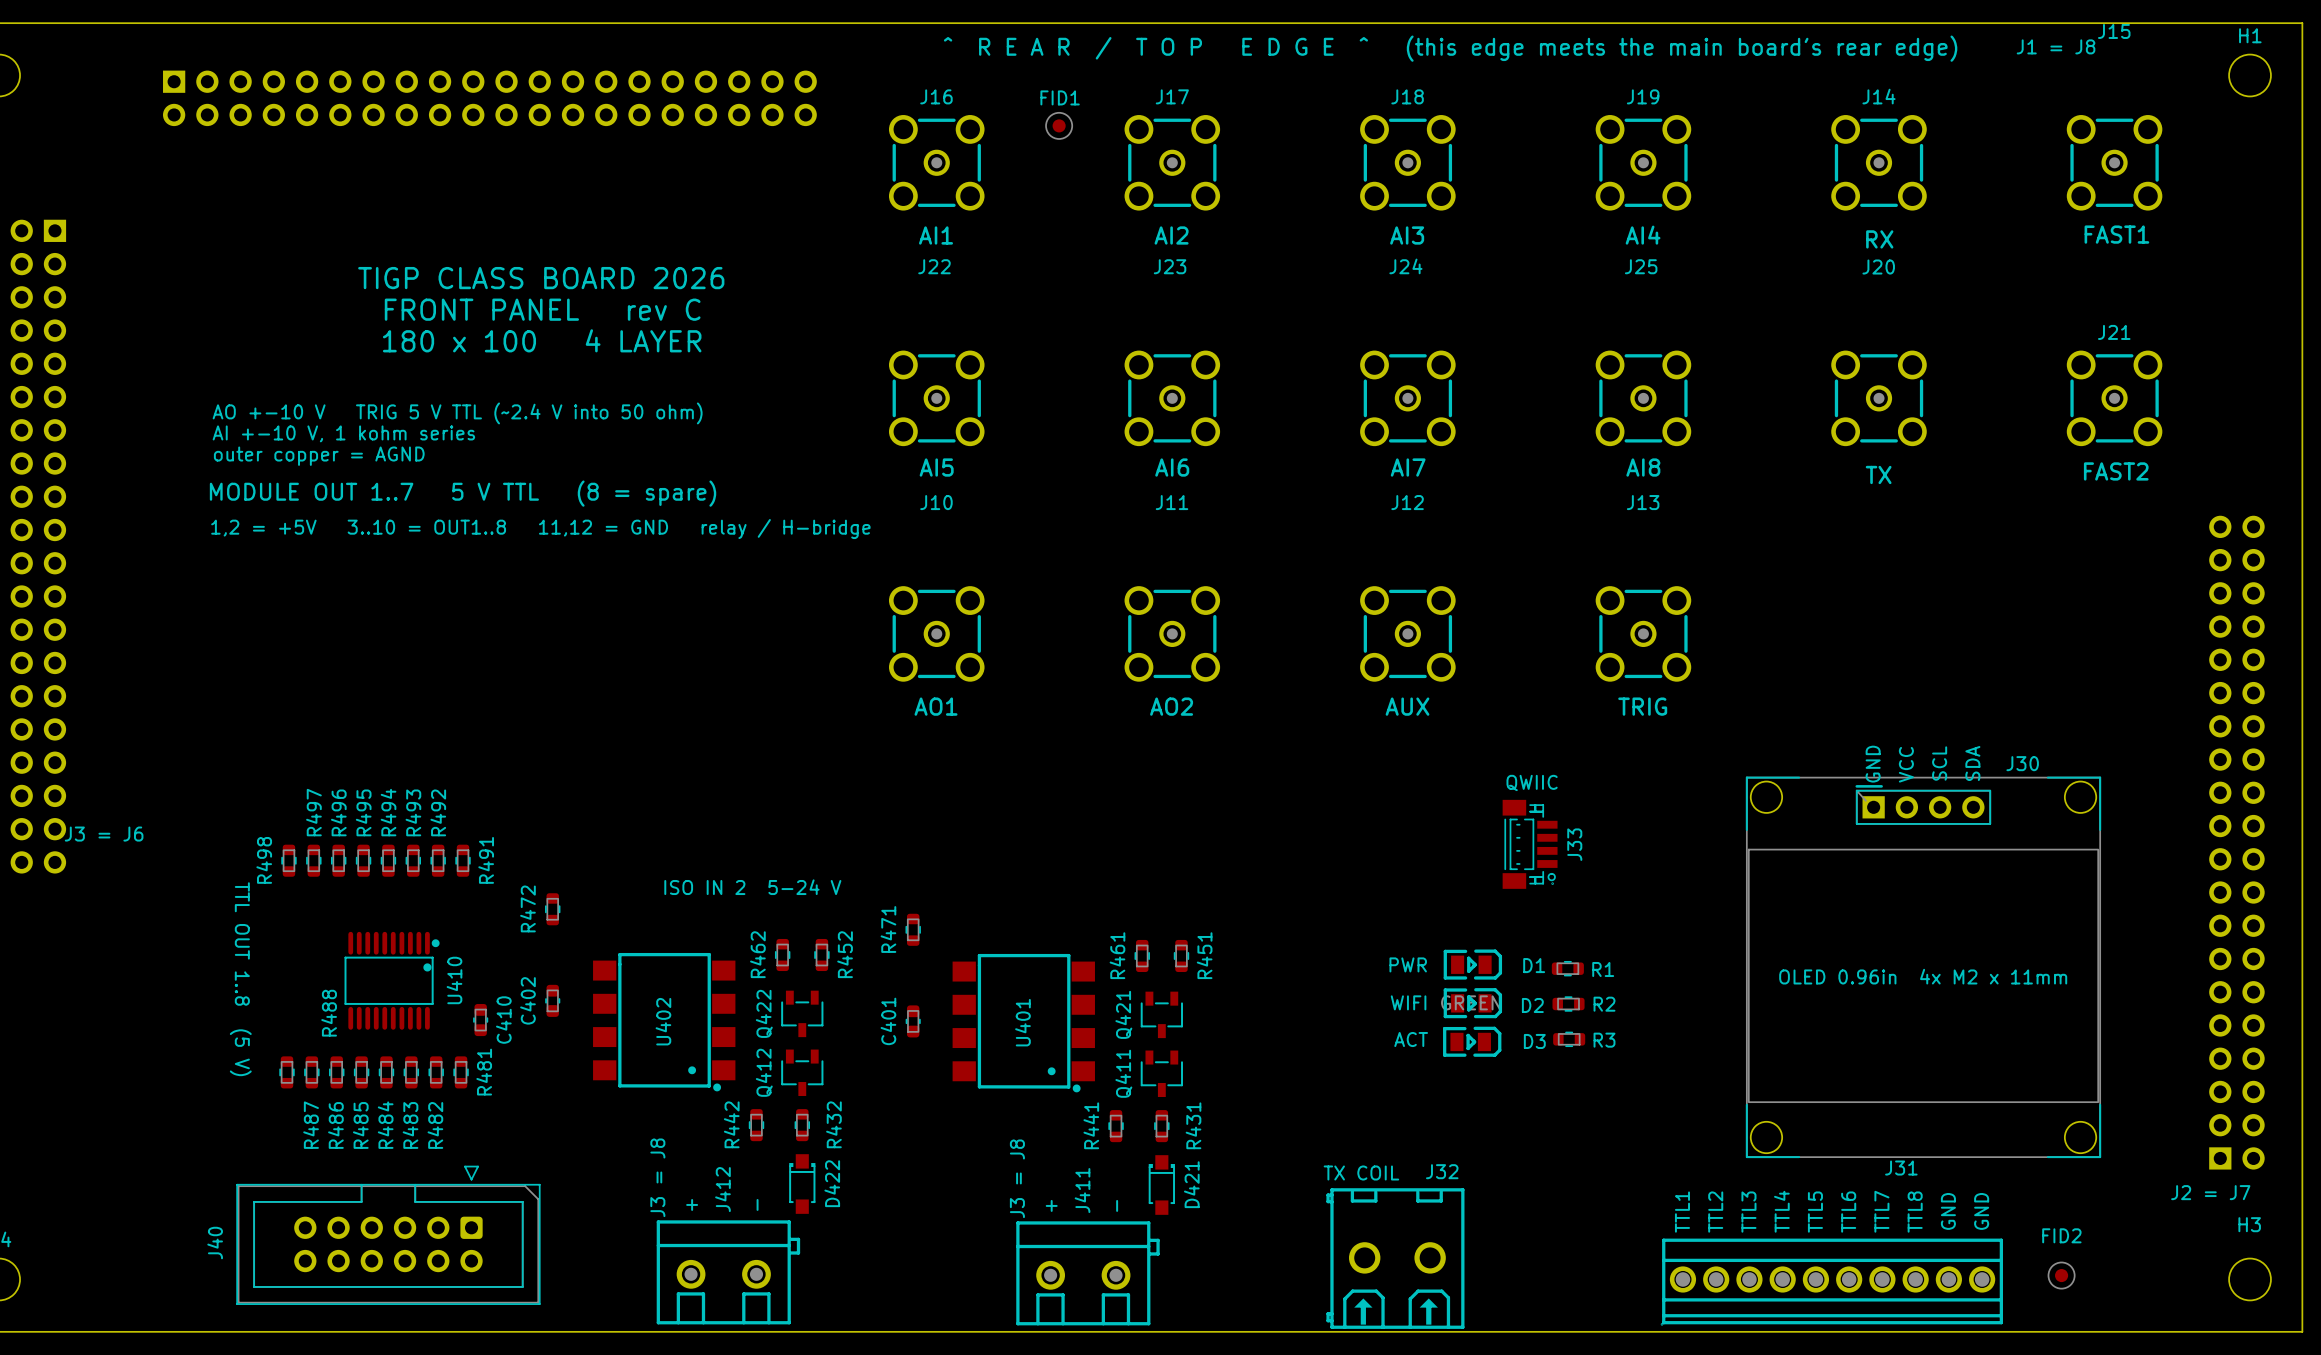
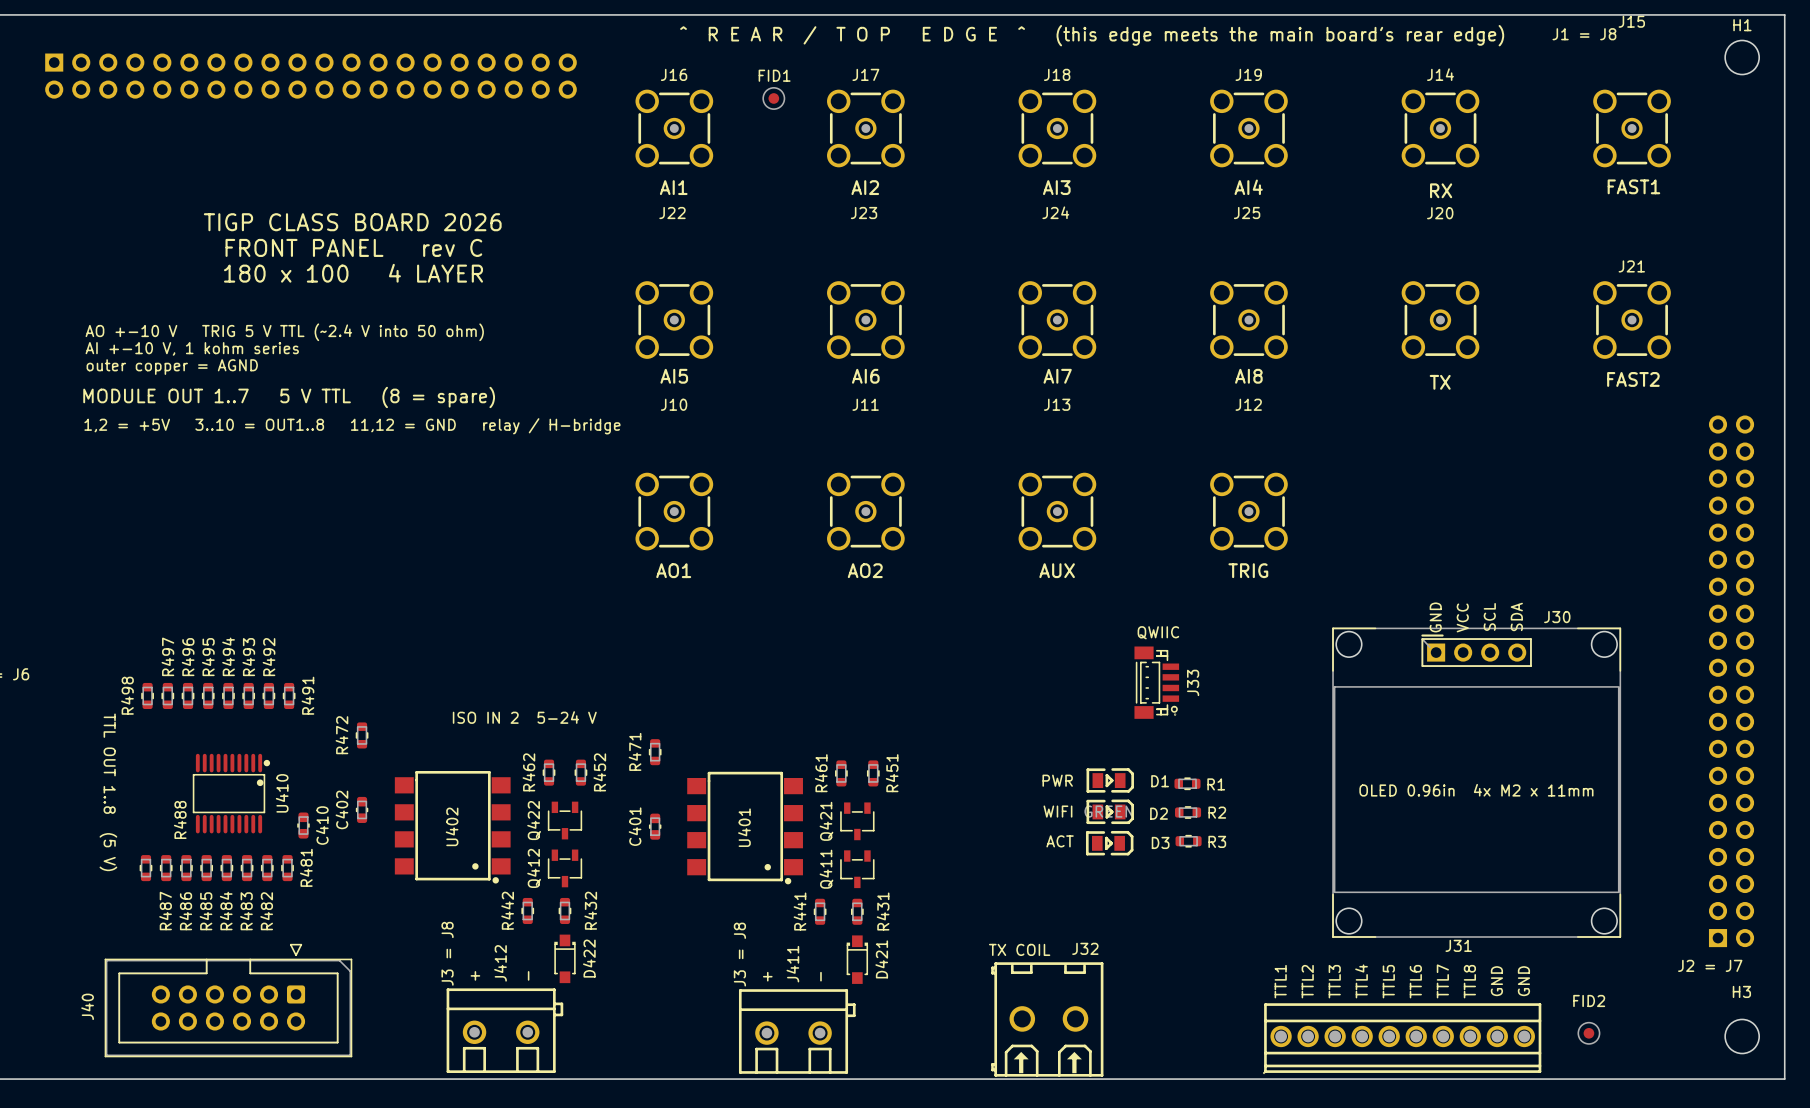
J12 name: J12 (1407, 502) -> J13 (1057, 404)
J13 name: J13 (1643, 502) -> J12 (1248, 404)

